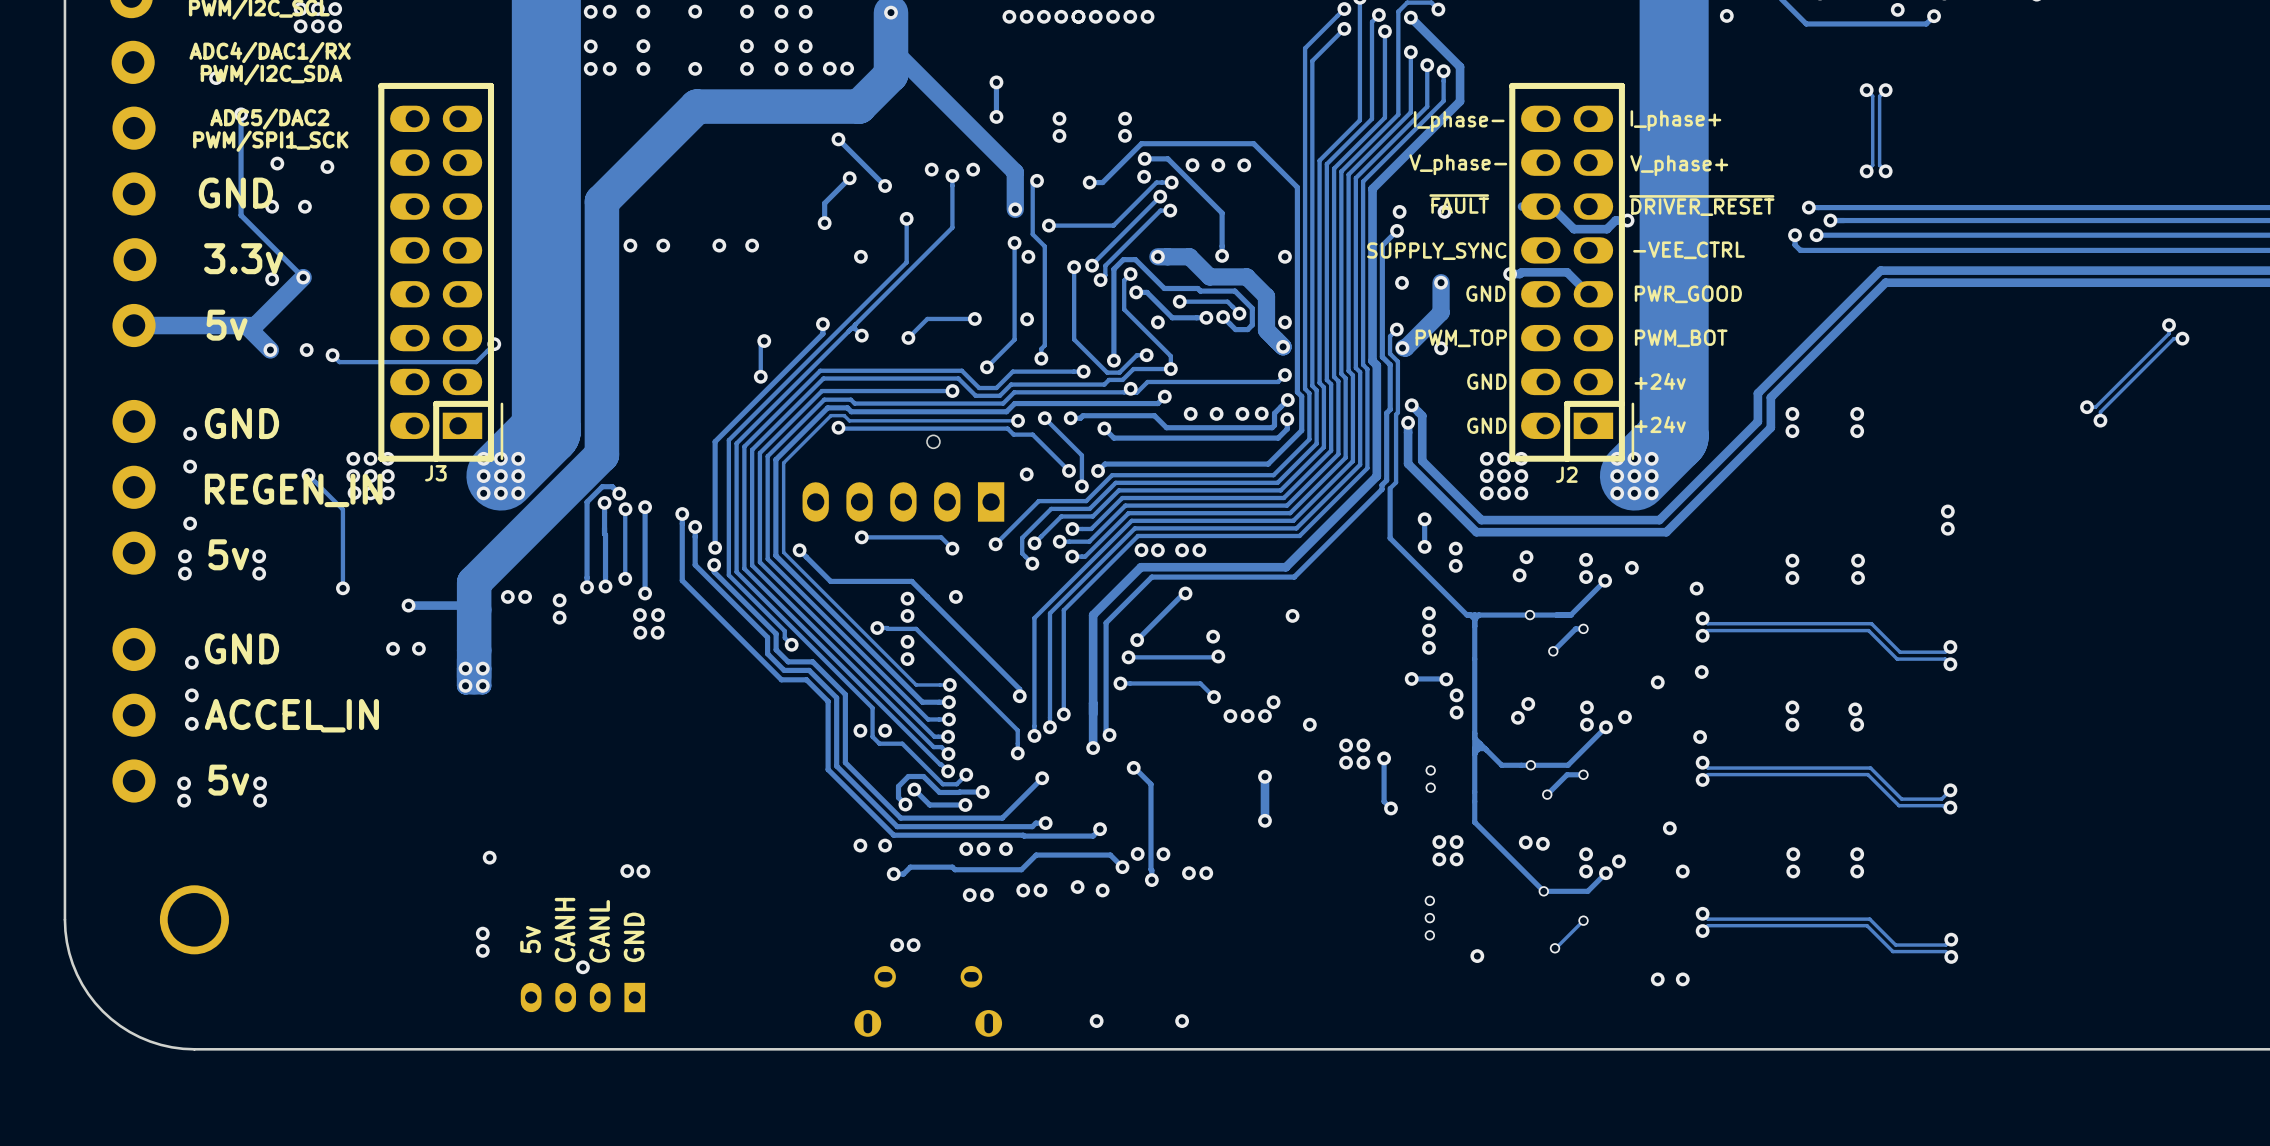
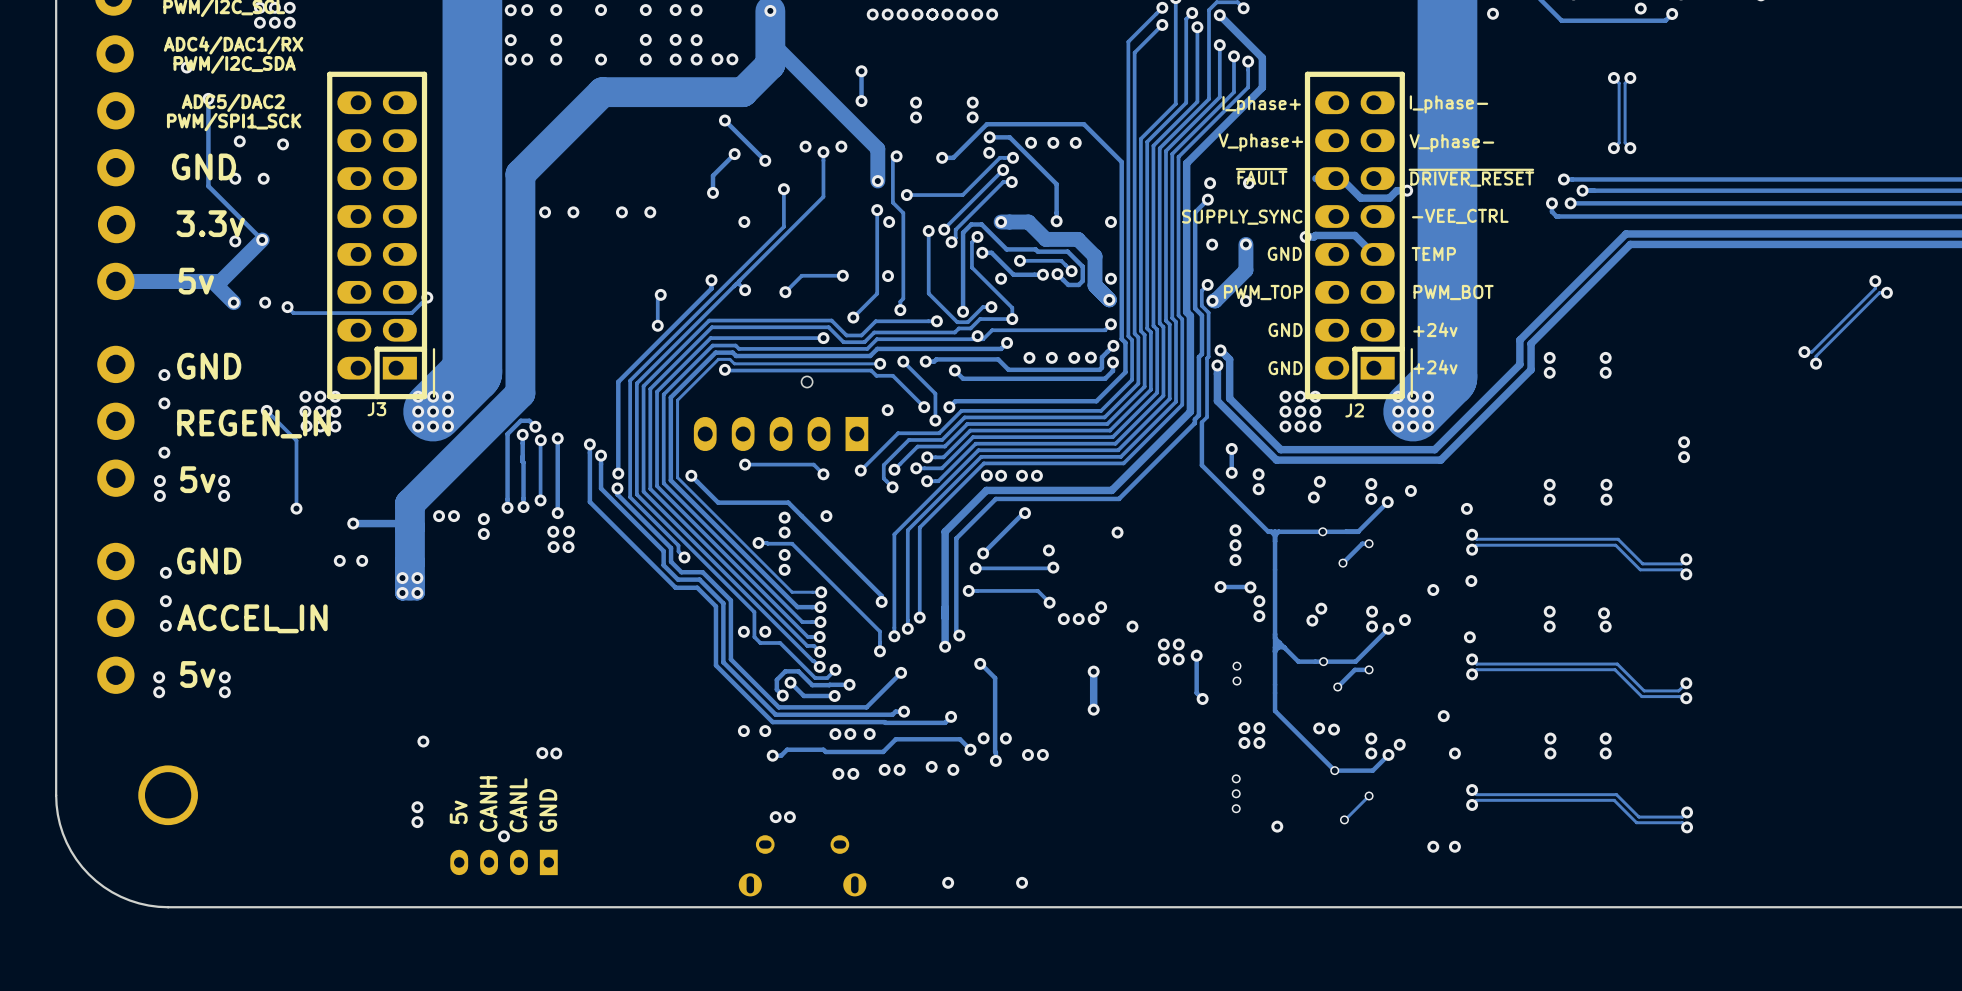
text: I_phase+ (1675, 120) -> I_phase- (1448, 104)
text: I_phase- (1459, 121) -> I_phase+ (1261, 105)
text: V_phase- (1458, 164) -> V_phase+ (1260, 142)
text: V_phase+ (1679, 165) -> V_phase- (1451, 143)
text: none -> TEMP (1433, 254)
text: PWR_GOOD (1688, 294) -> none

